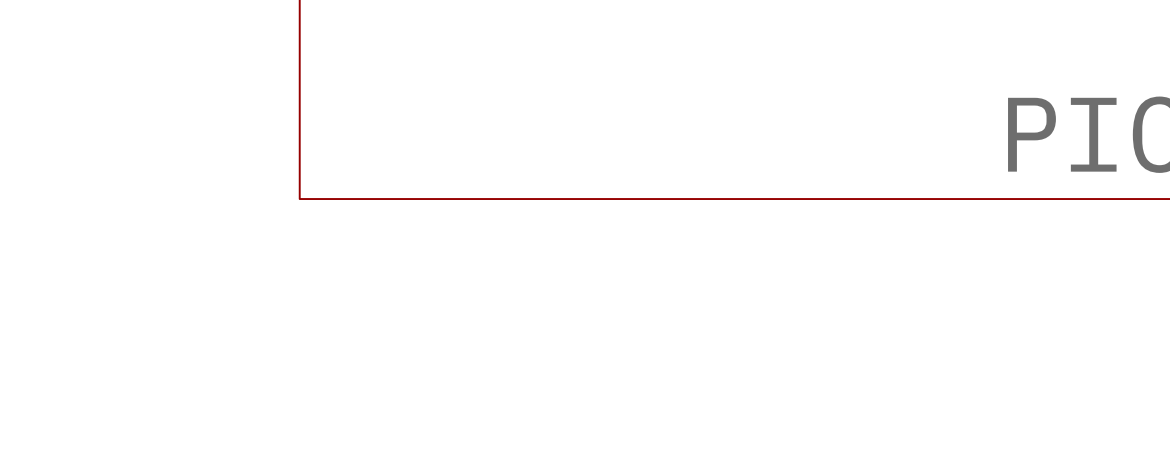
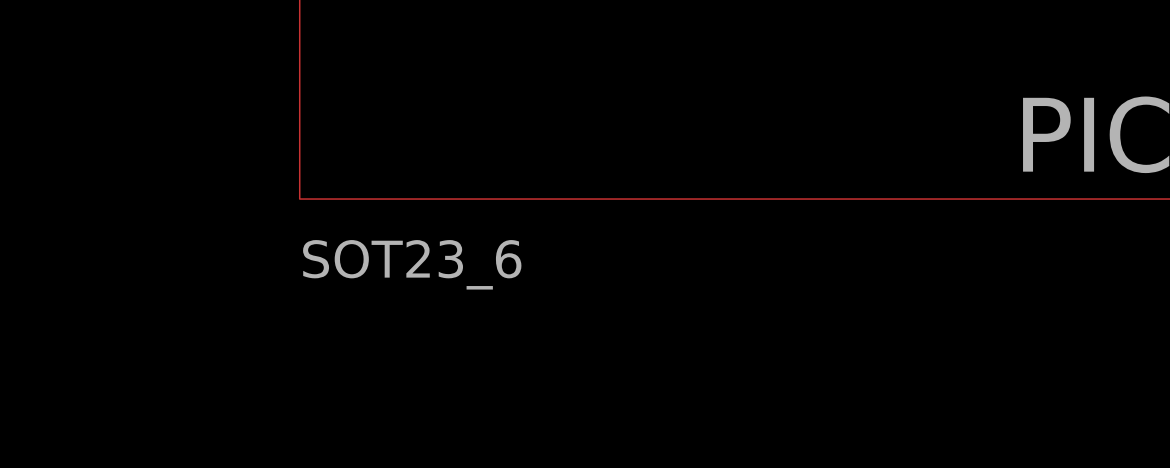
part text: none -> SOT23_6 (412, 264)

